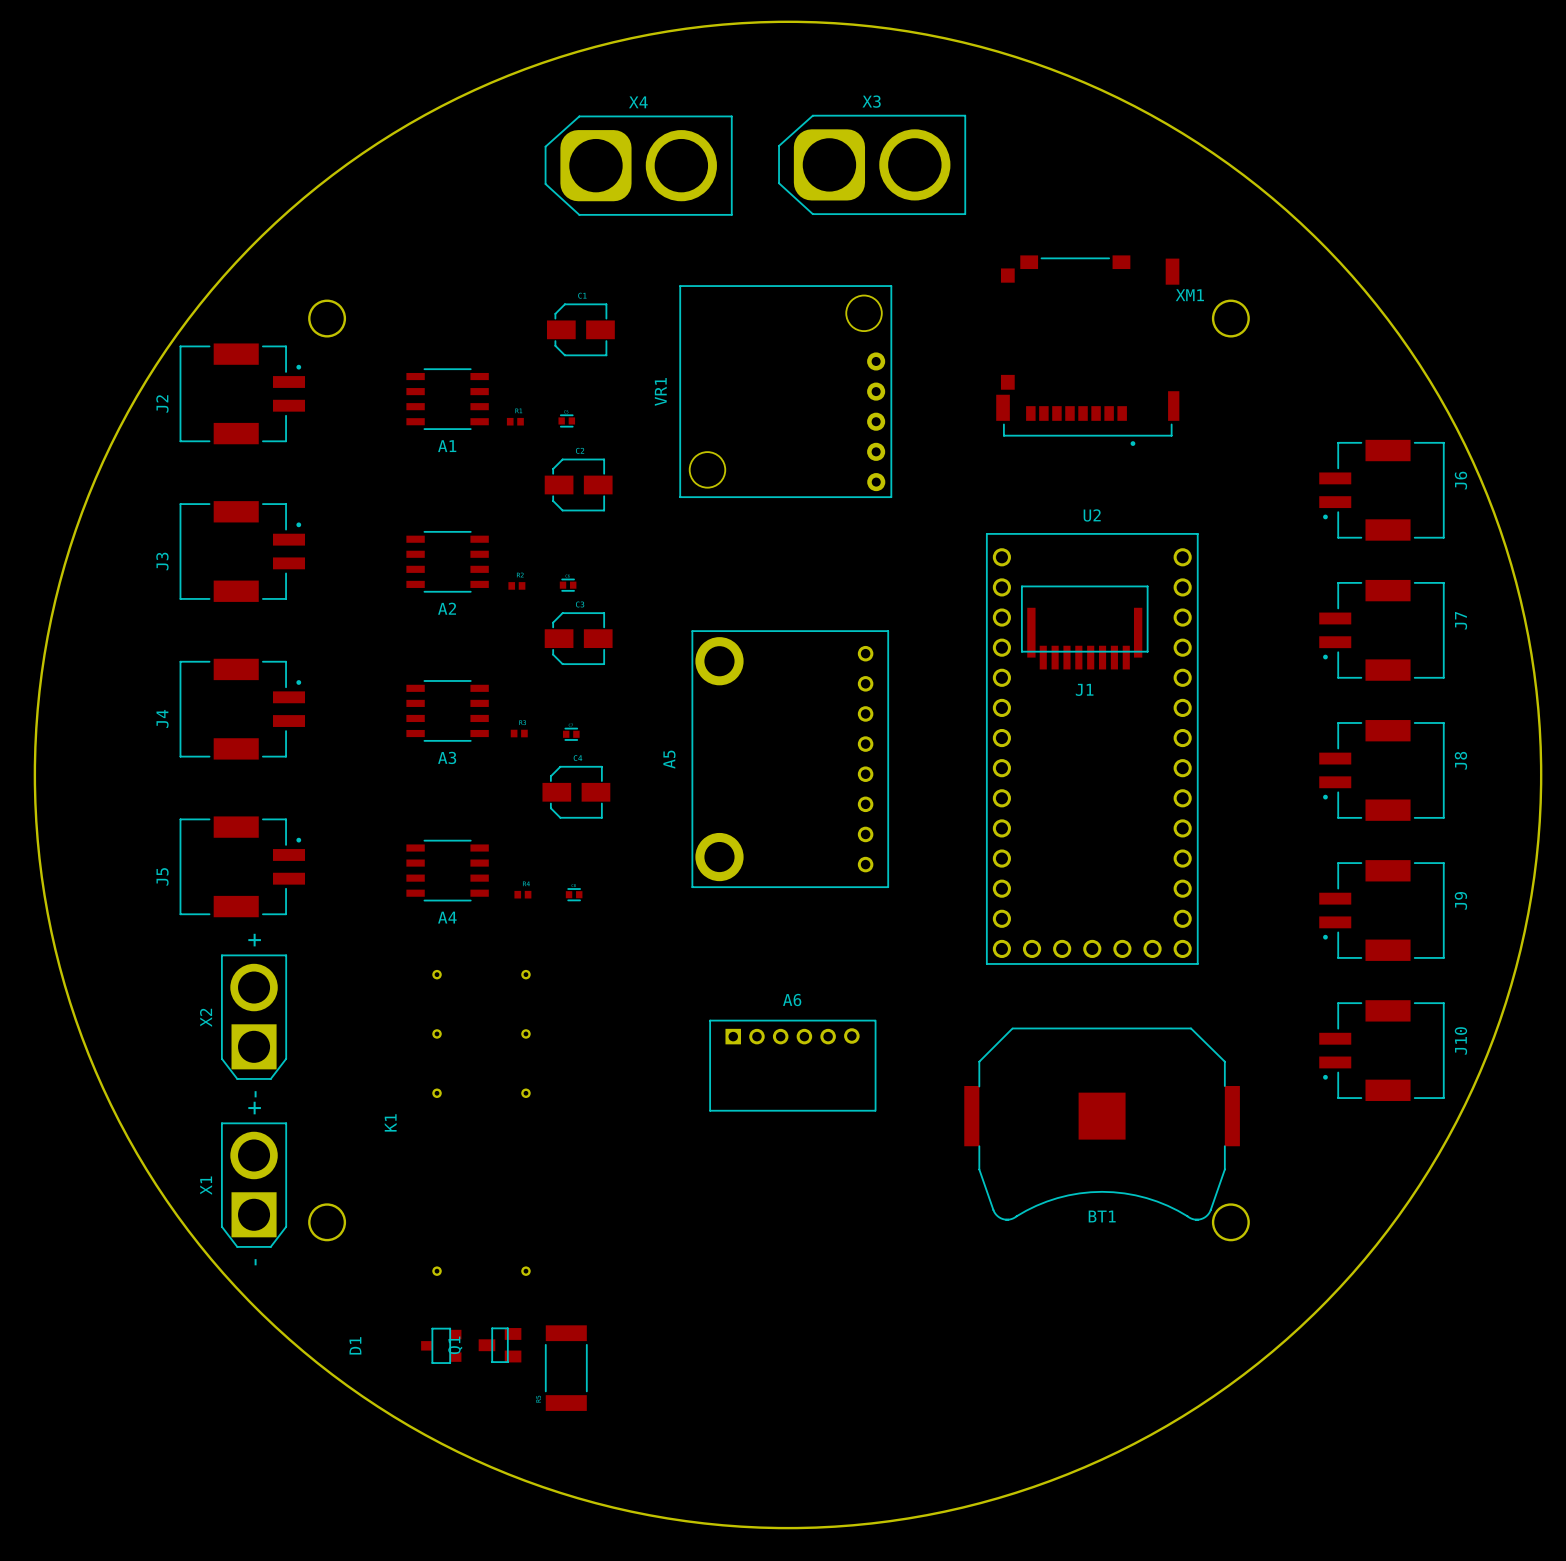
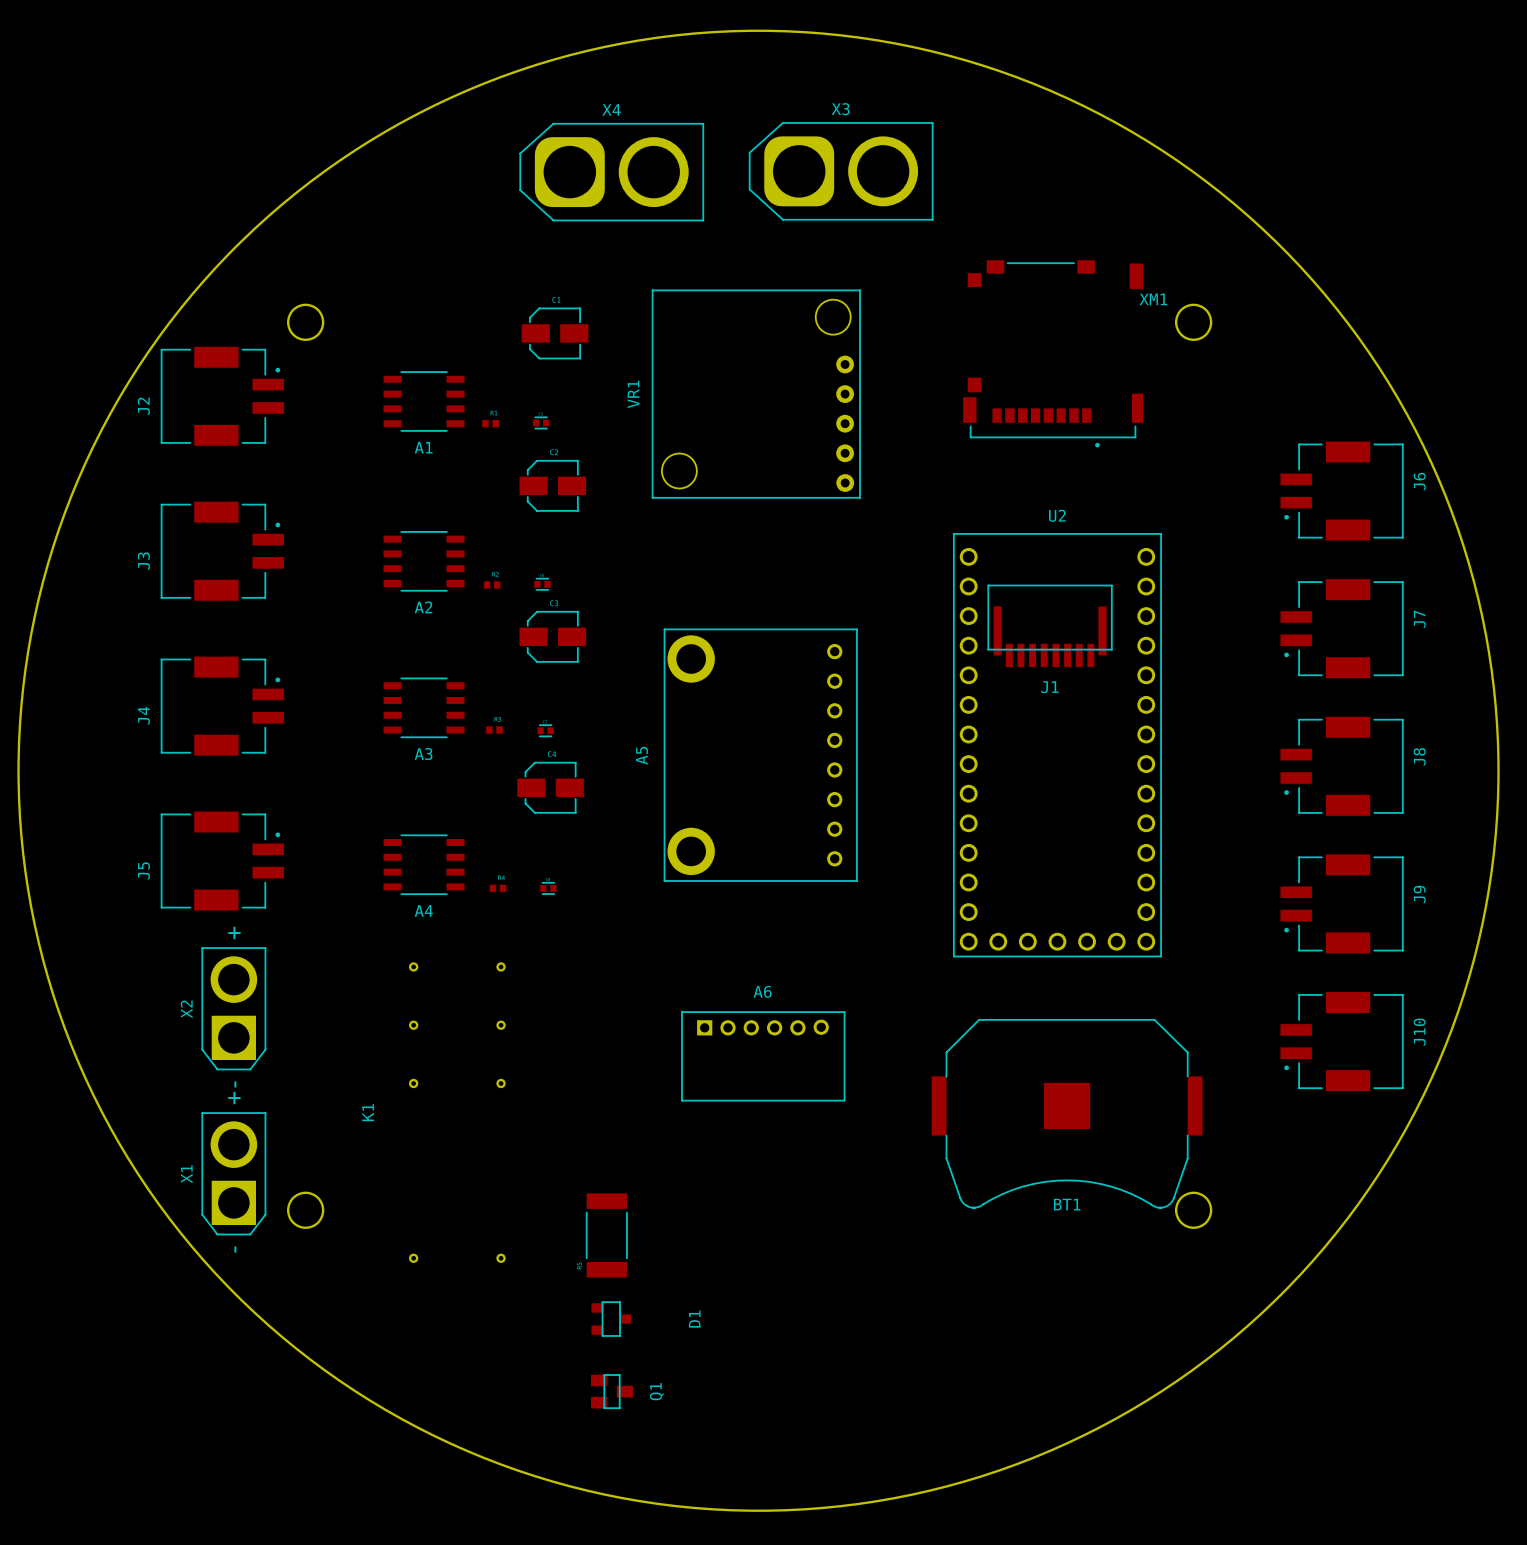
D1 rotation: 0° (441, 1345) -> 180° (611, 1319)
D1 position: (441, 1345) -> (611, 1319)
Q1 rotation: 0° (500, 1345) -> 180° (612, 1391)
Q1 position: (500, 1345) -> (612, 1391)
part position: (566, 1368) -> (606, 1235)

